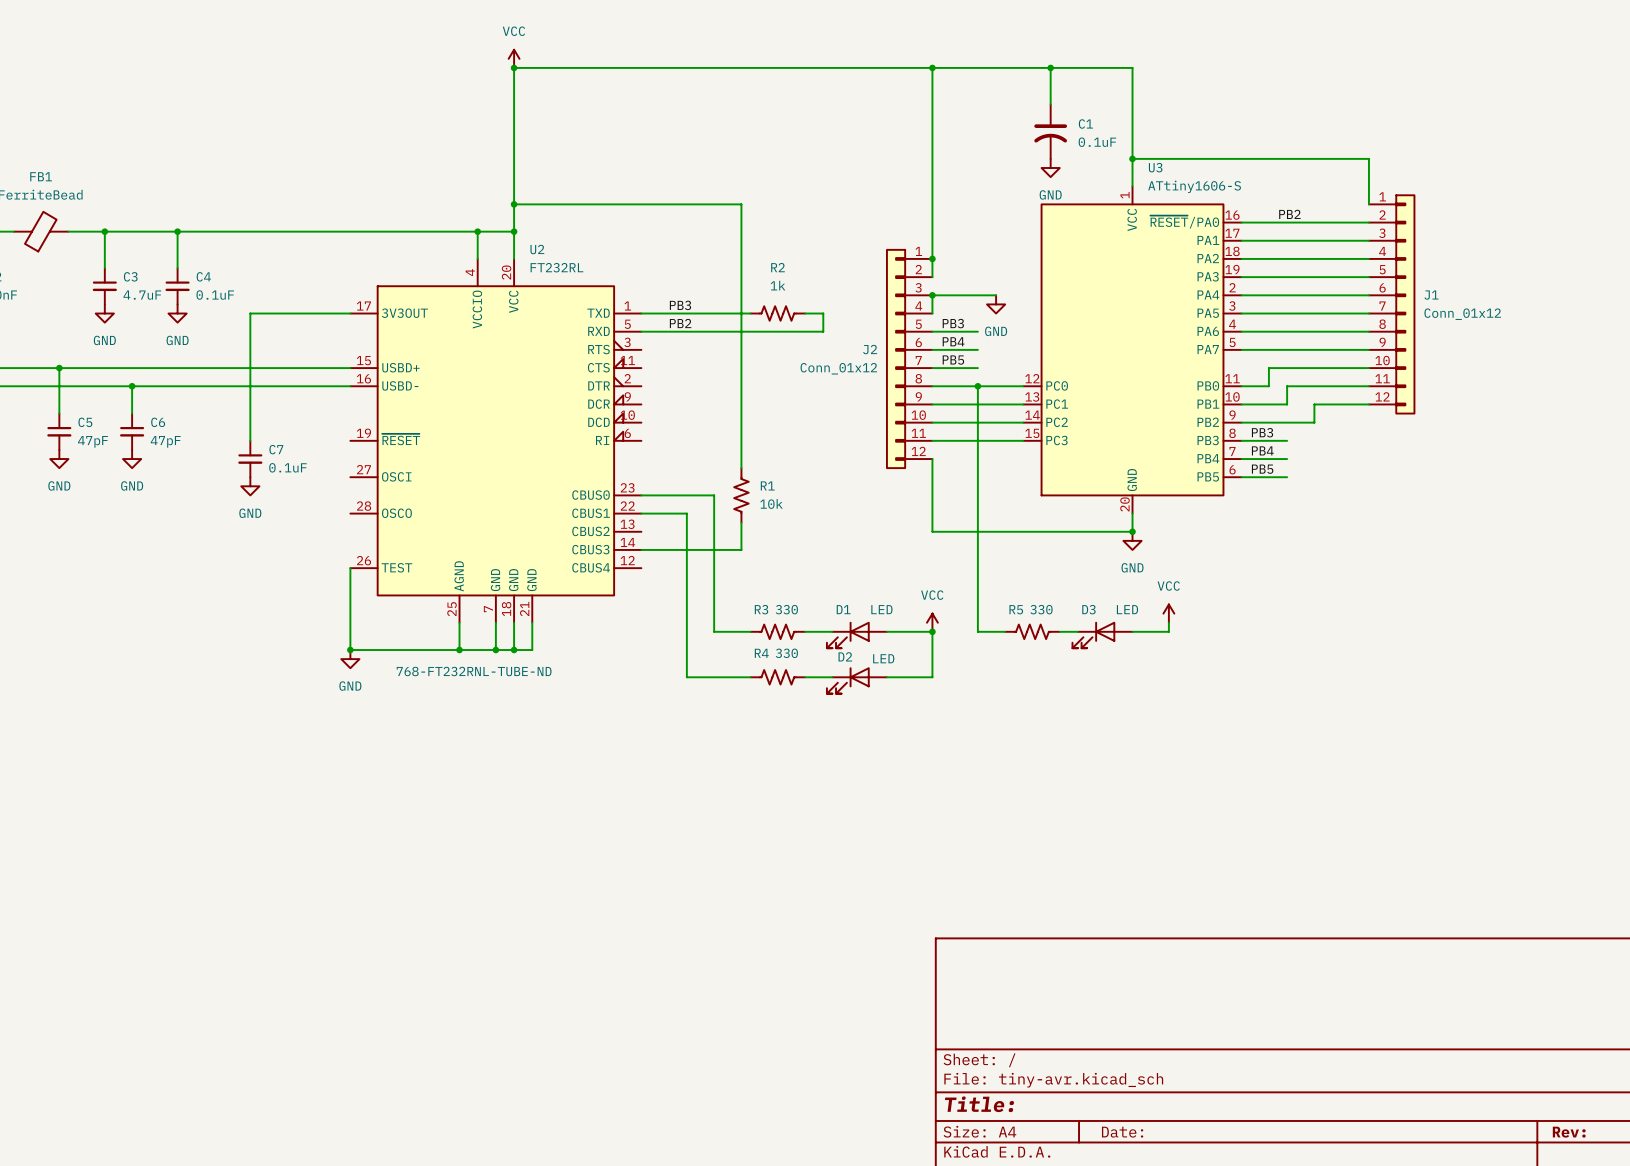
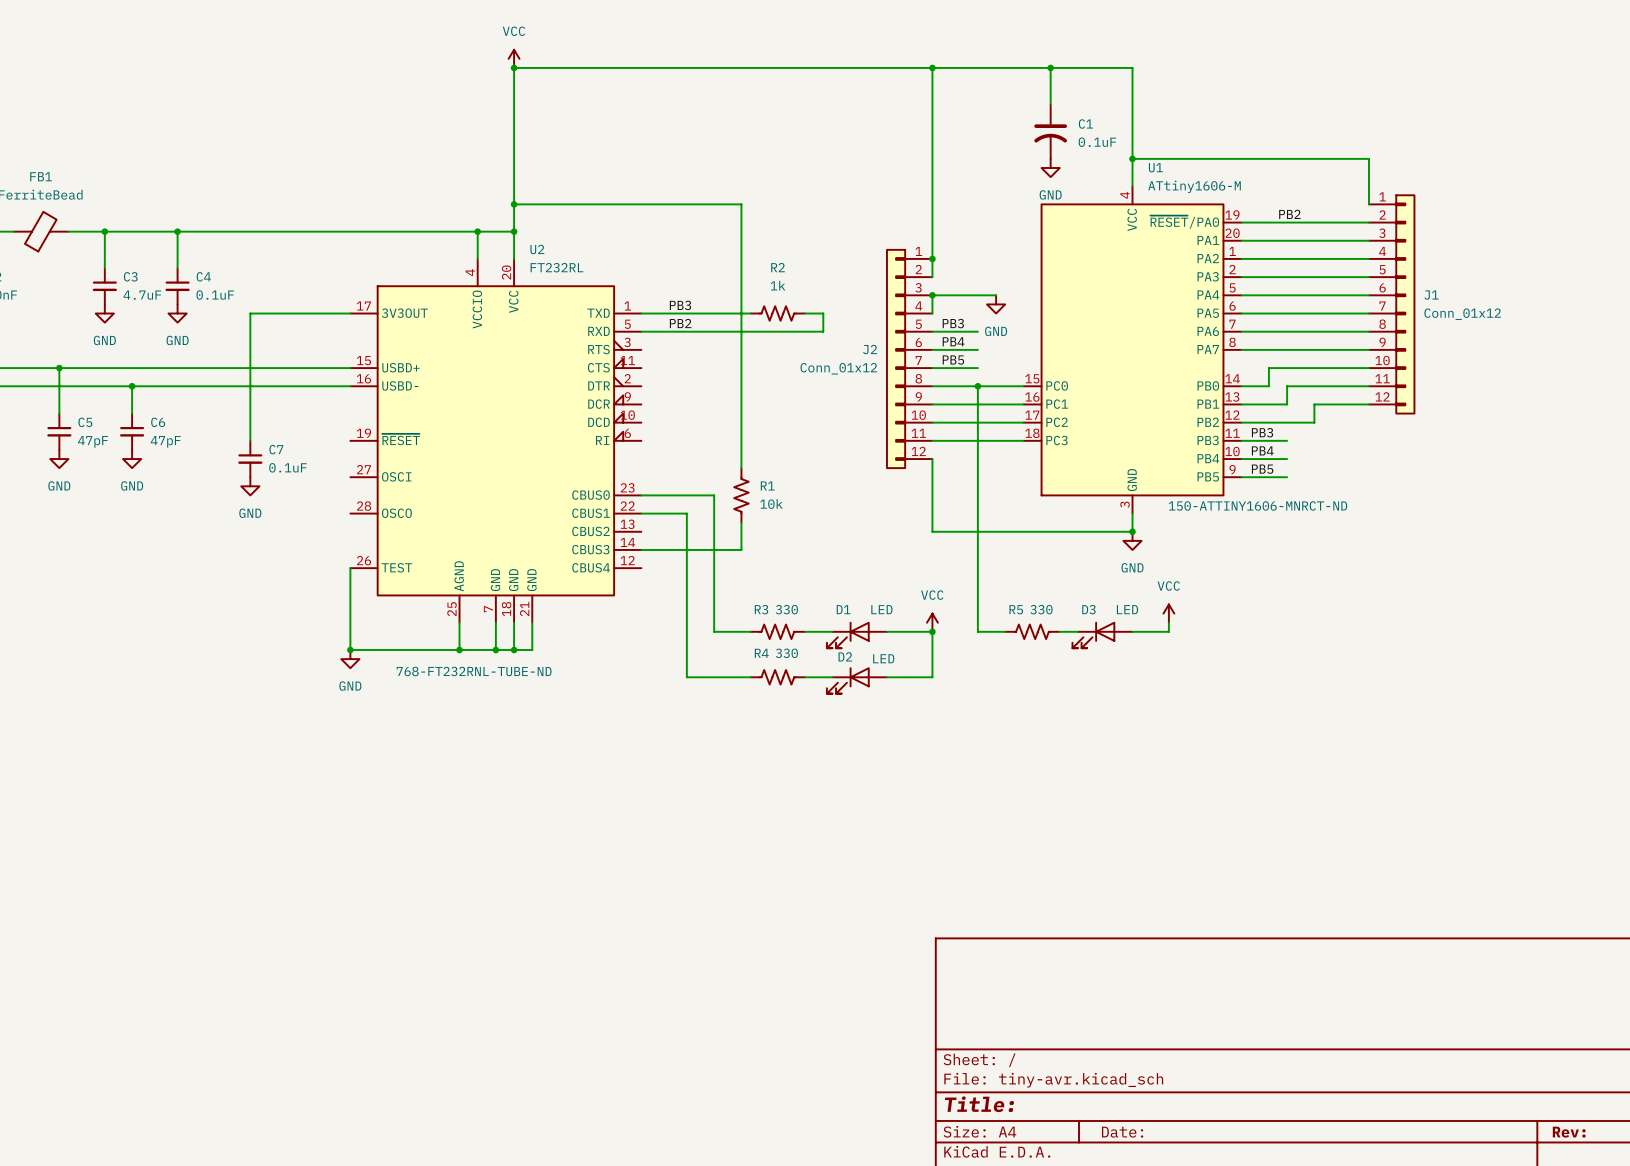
U3 name: U3 (1155, 167) -> U1 (1155, 167)
U3 symbol: [1023, 186, 1242, 514] -> [1023, 186, 1242, 514]
U3 value: ATtiny1606-S (1194, 186) -> ATtiny1606-M (1194, 186)
U3 text: none -> 150-ATTINY1606-MNRCT-ND (1257, 505)

